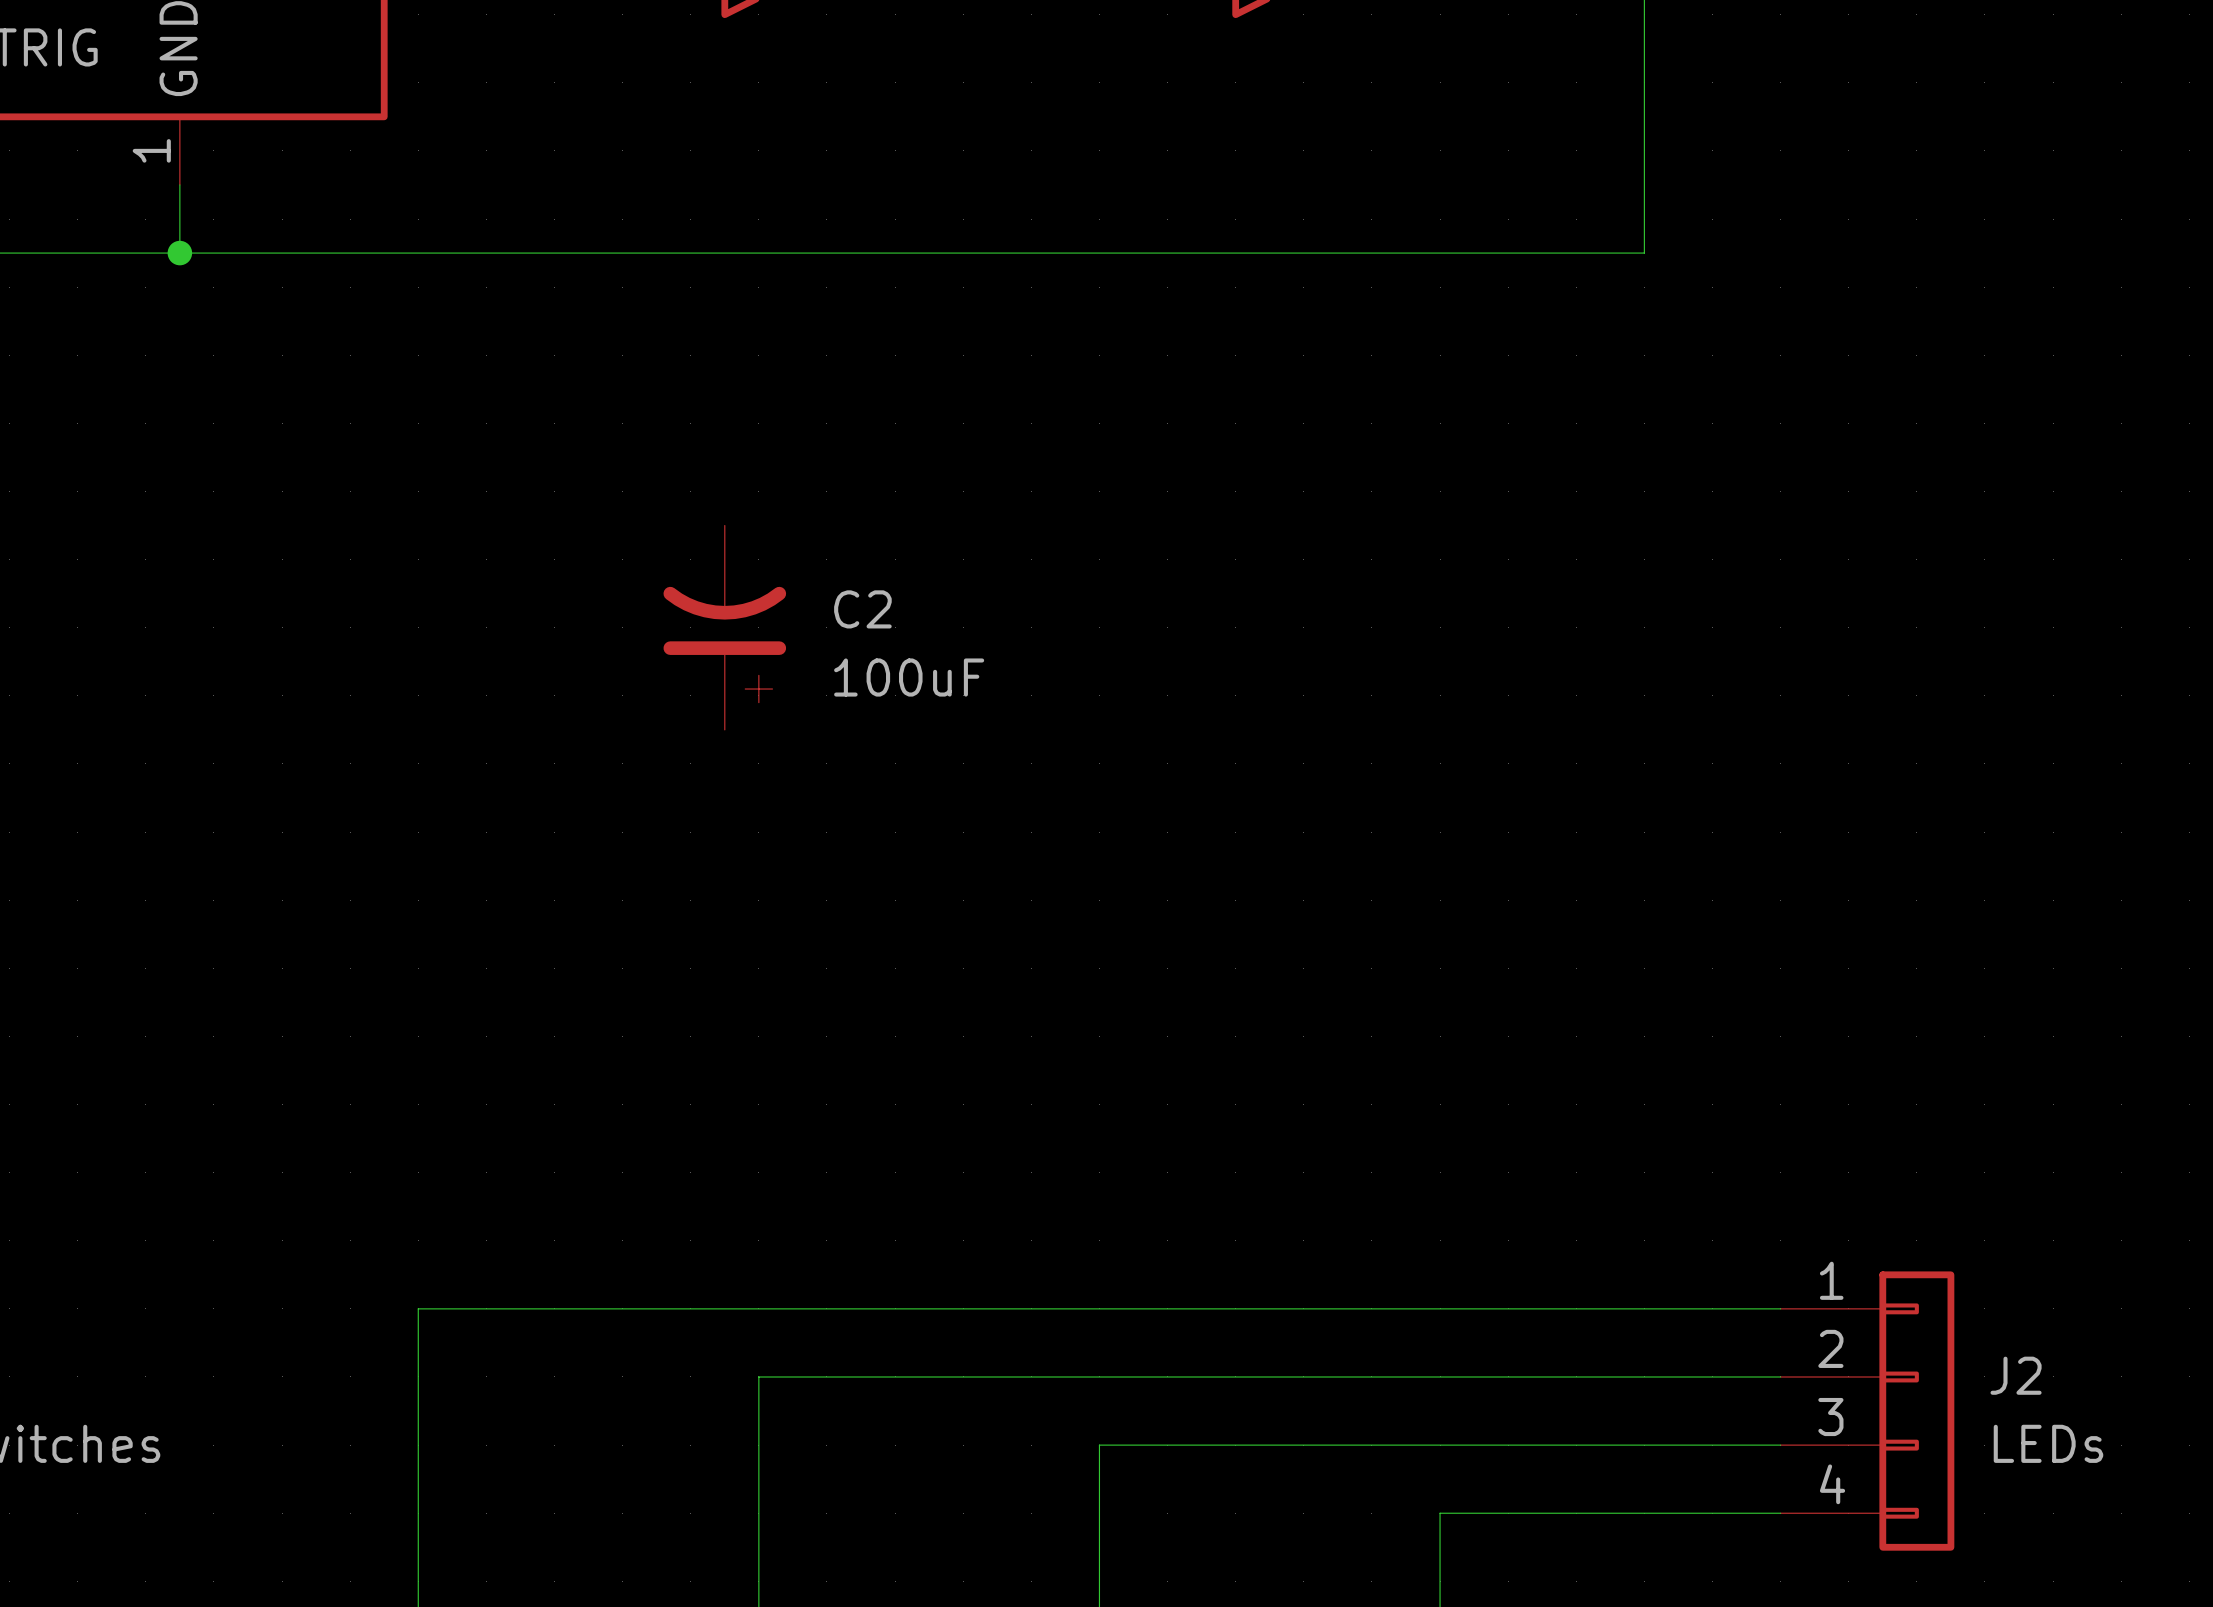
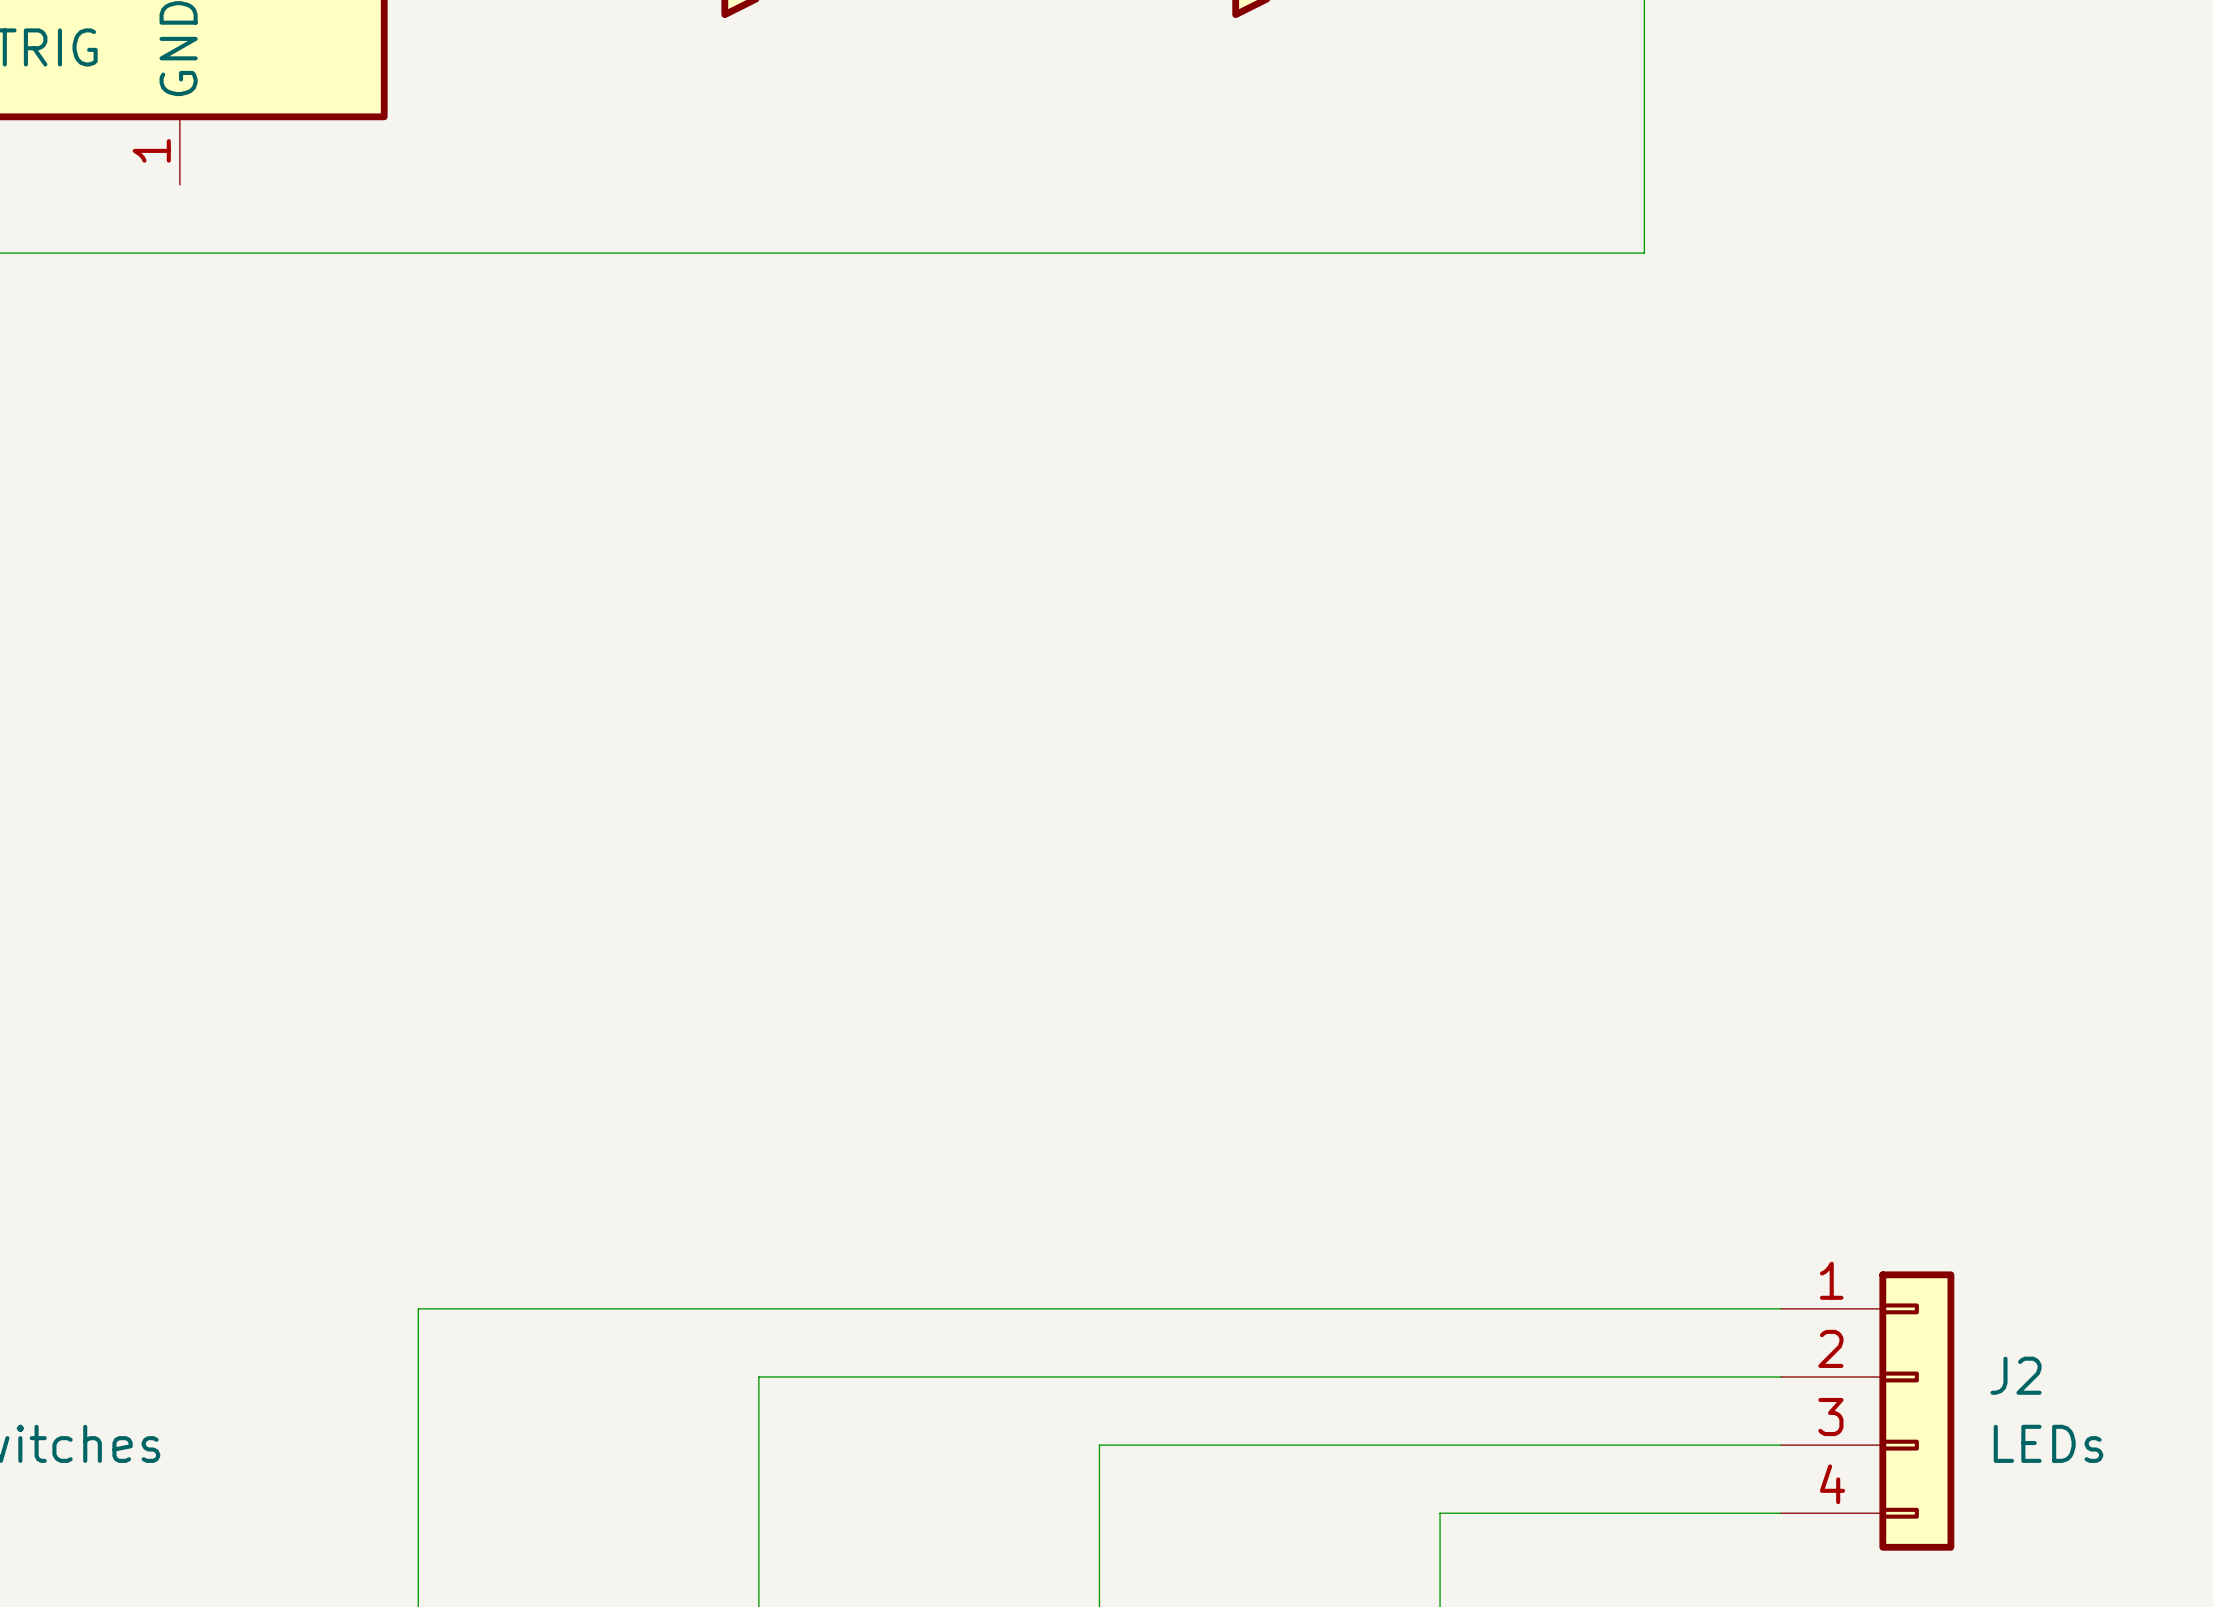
wire: (179, 184) (179, 253) -> none
junction: (179, 253) -> none
C2: 100uF (724, 627) -> none

